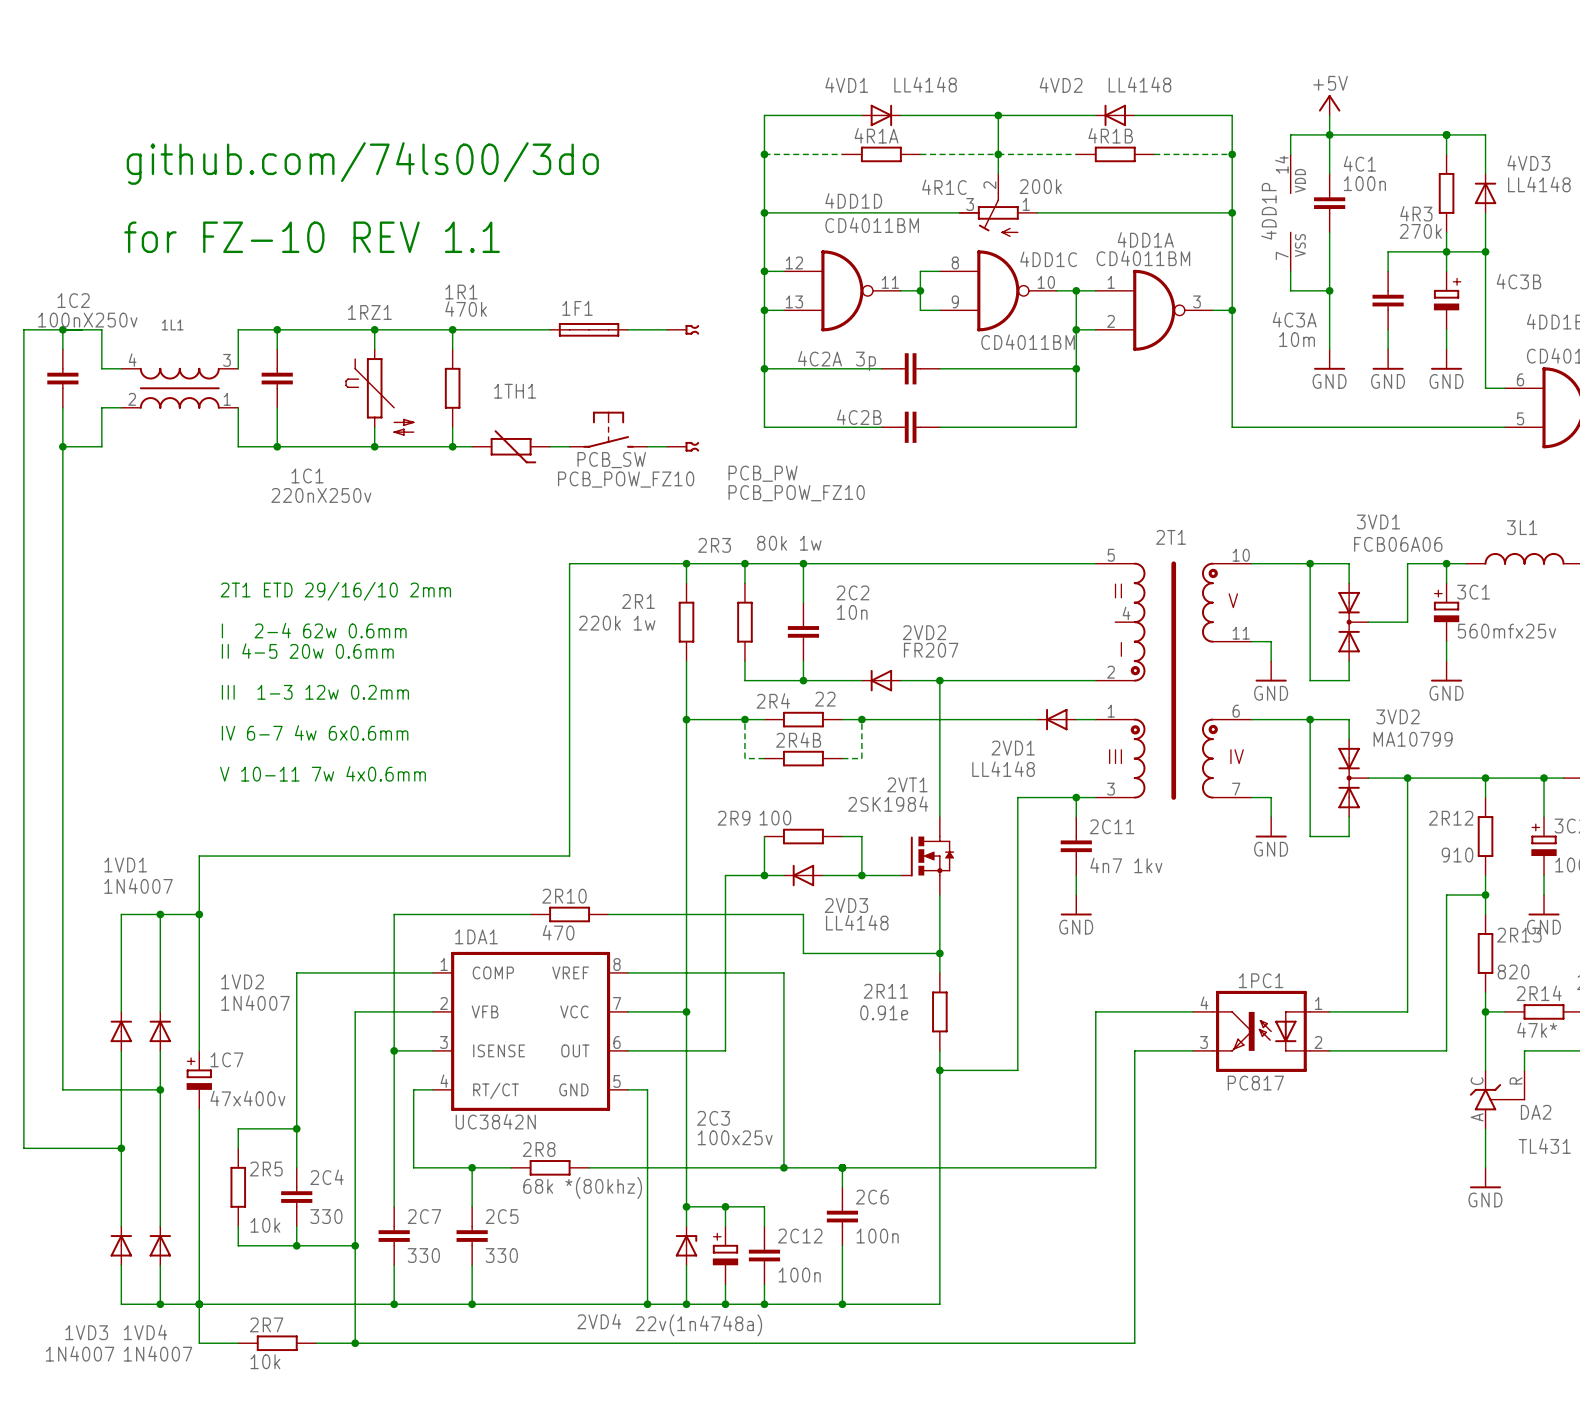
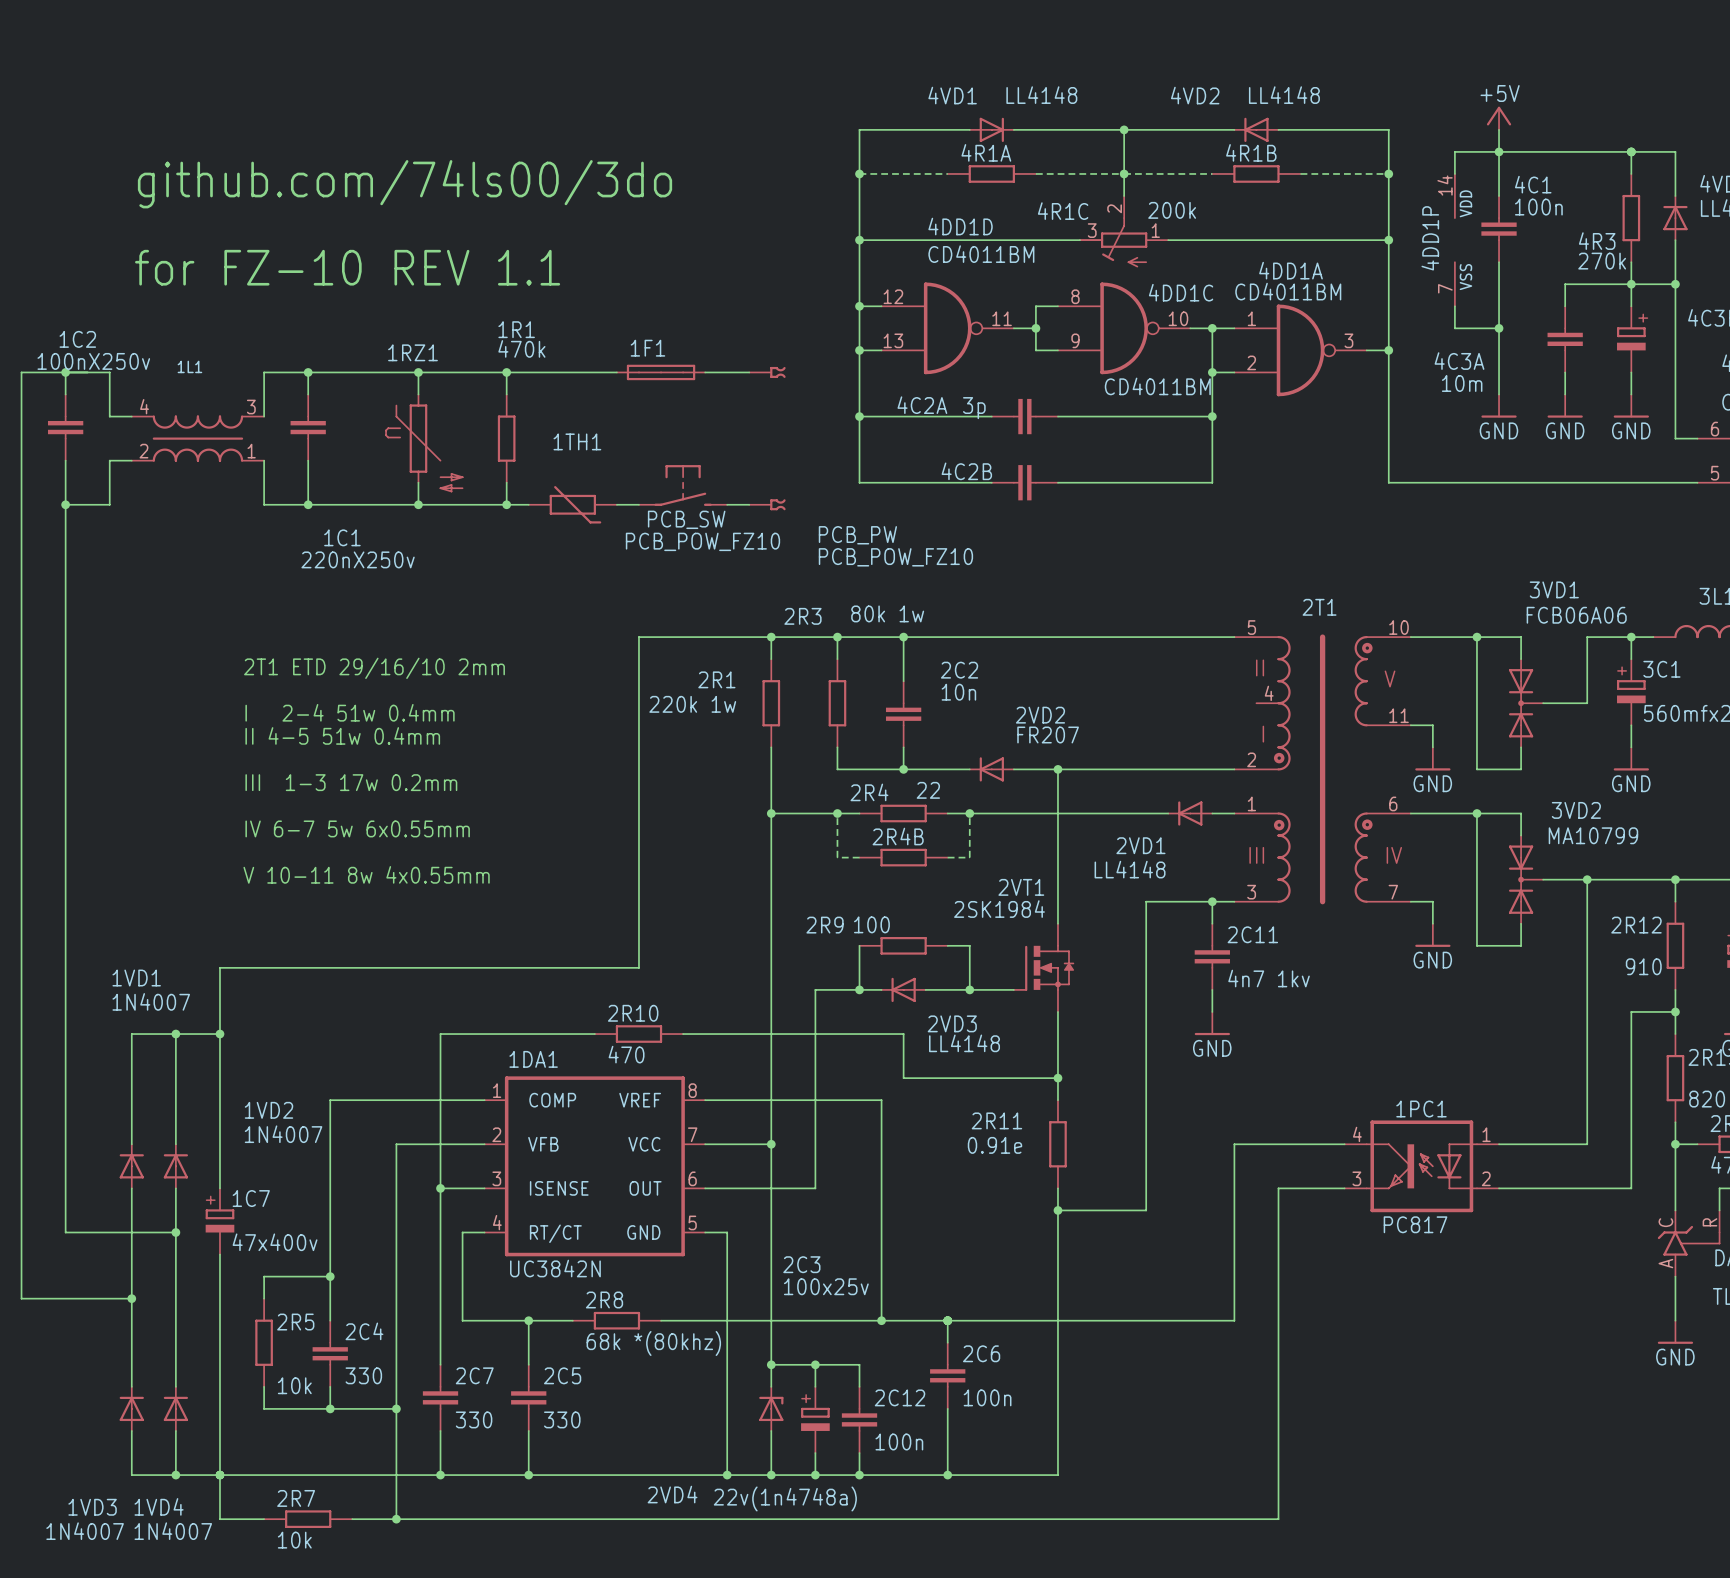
text: I 2-4 62w 0.6mm (314, 630) -> I 2-4 51w 0.4mm (350, 712)
text: II 4-5 20w 0.6mm (307, 651) -> II 4-5 51w 0.4mm (342, 735)
text: III 1-3 12w 0.2mm (315, 692) -> III 1-3 17w 0.2mm (351, 782)
text: IV 6-7 4w 6x0.6mm (315, 732) -> IV 6-7 5w 6x0.55mm (357, 828)
text: V 10-11 7w 4x0.6mm (322, 773) -> V 10-11 8w 4x0.55mm (366, 874)

